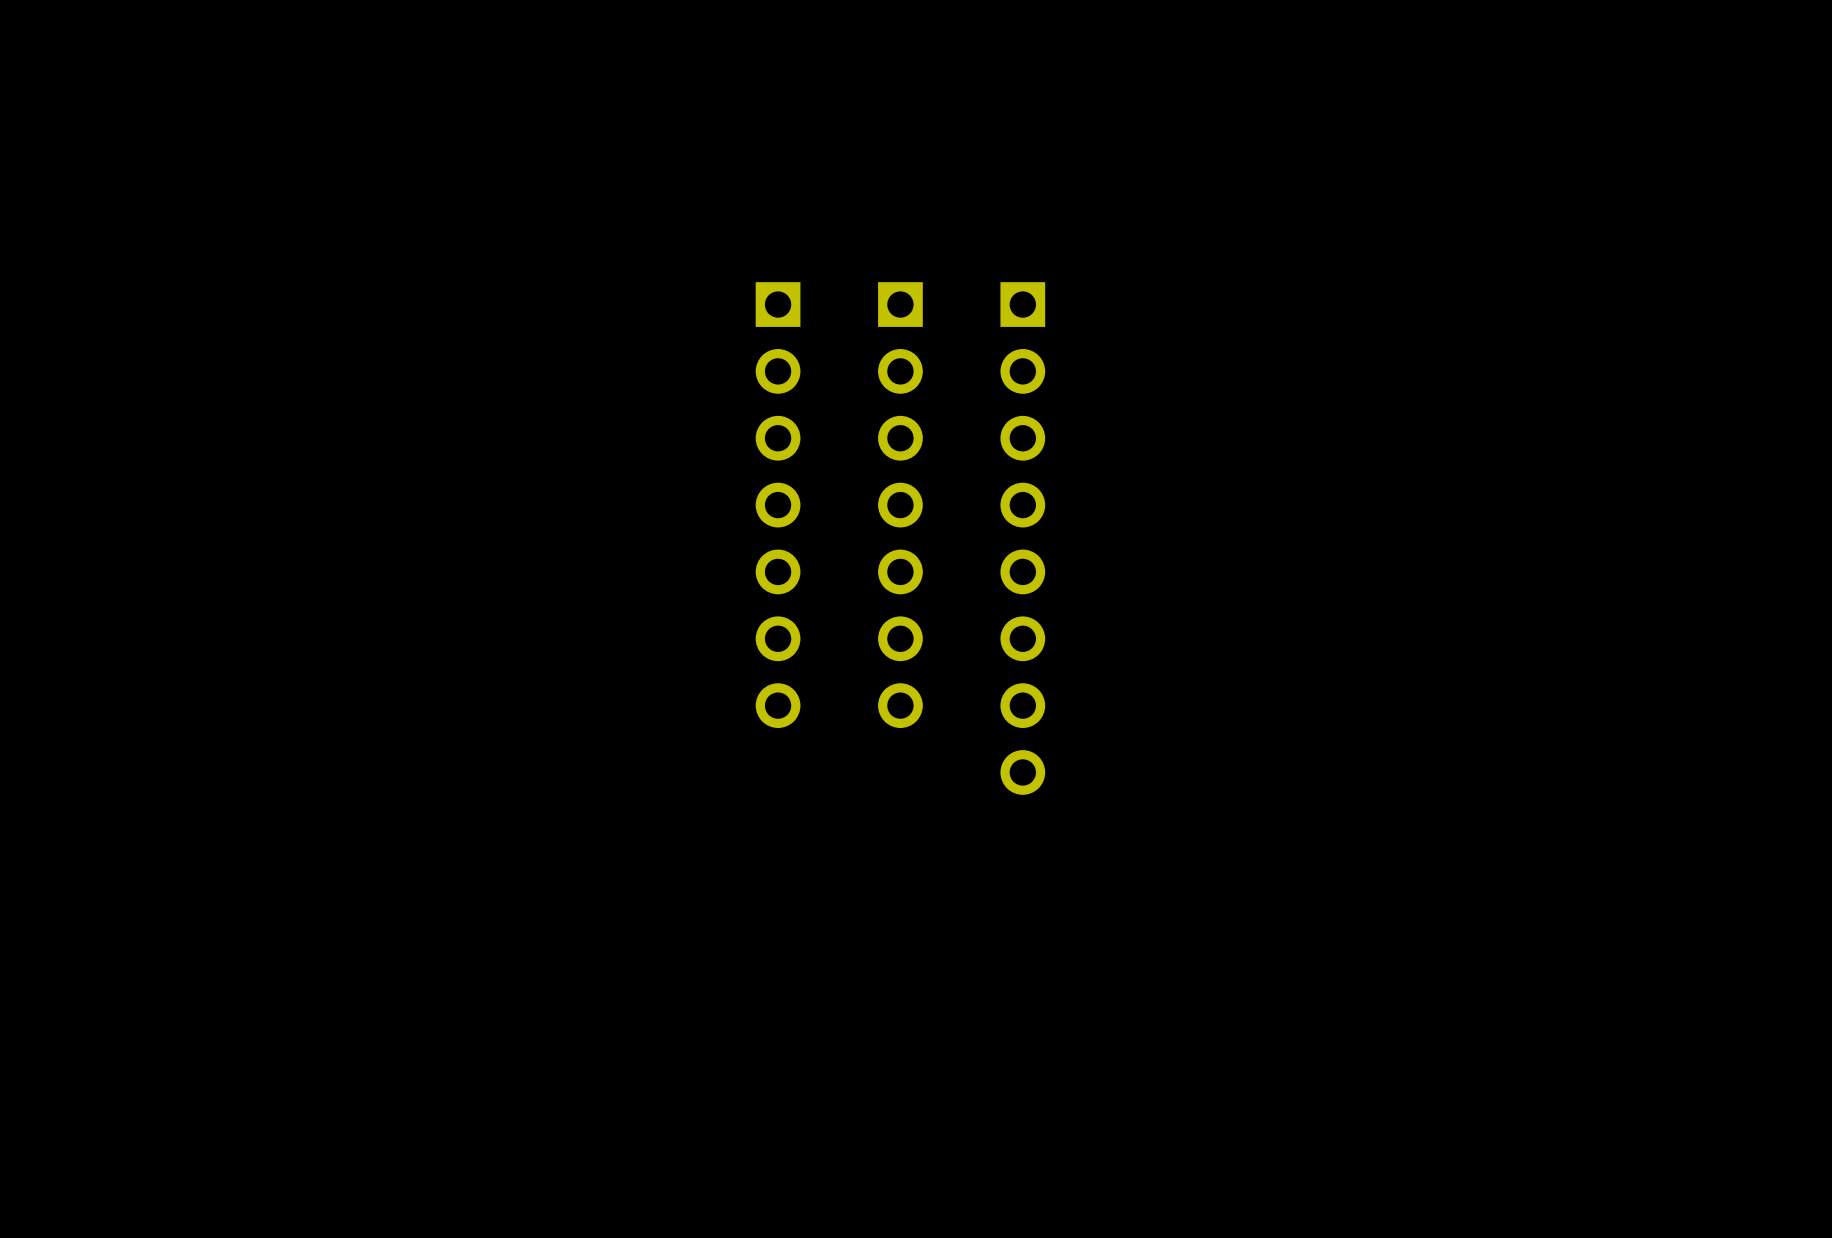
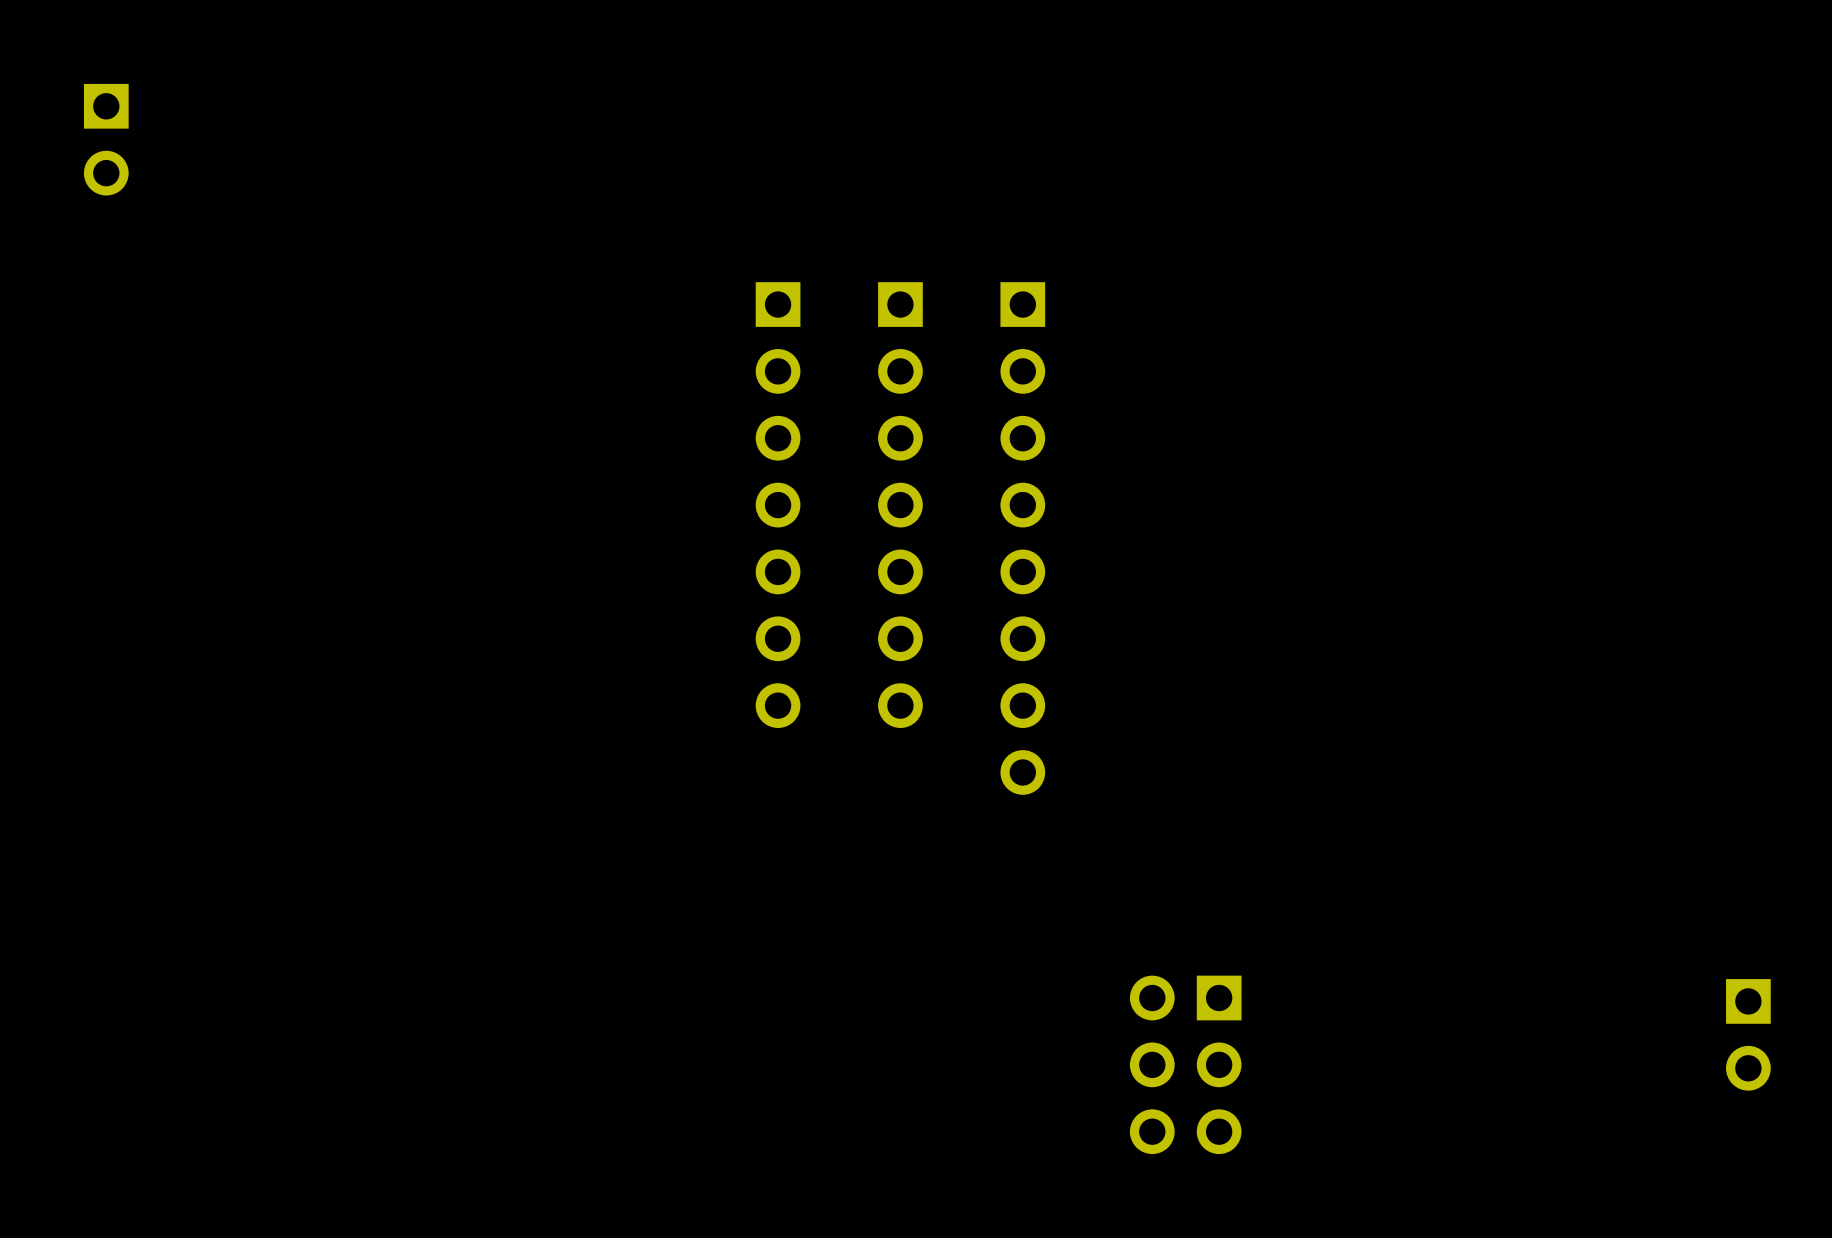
part: none -> (106, 139)
part: none -> (1748, 1034)
part: none -> (1185, 1064)

